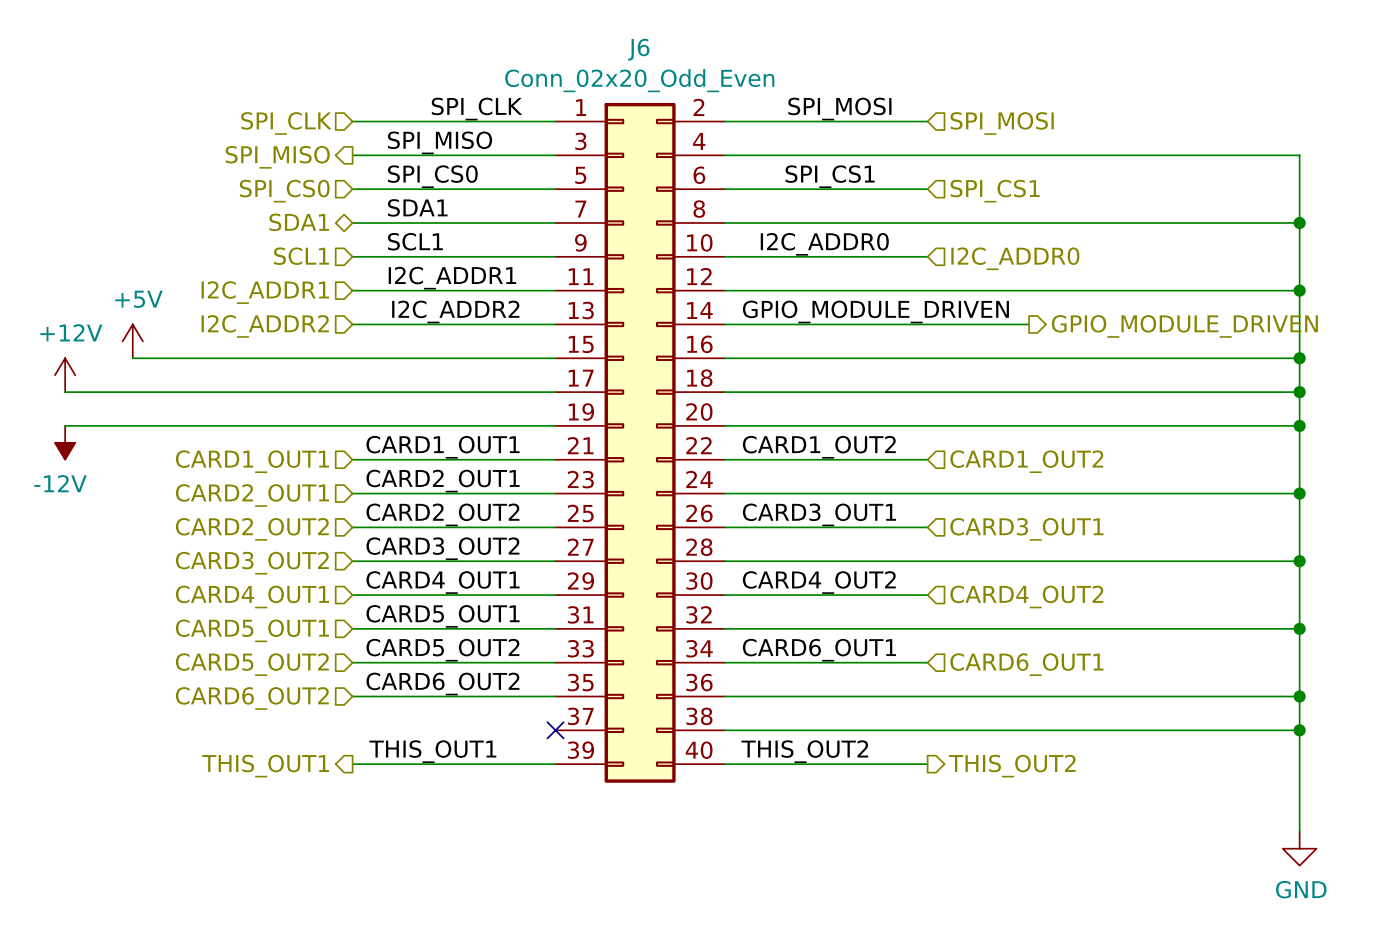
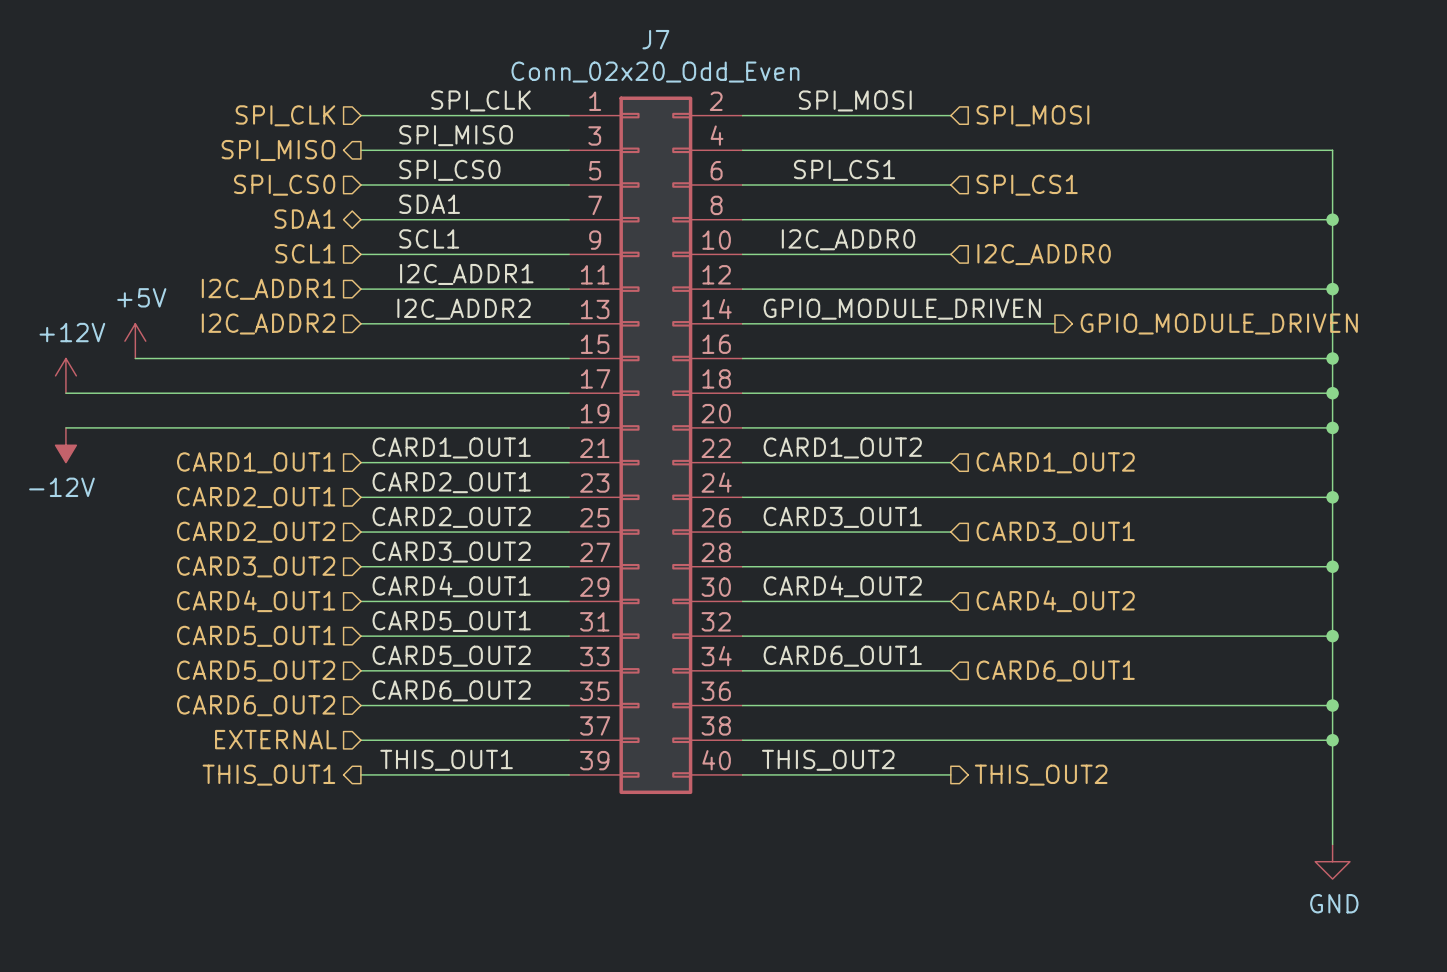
J6 name: J6 (638, 49) -> J7 (655, 39)
hierarchical label: none -> EXTERNAL (275, 739)
wire: none -> (360, 740) (569, 740)
no-connect mark: (555, 730) -> none

